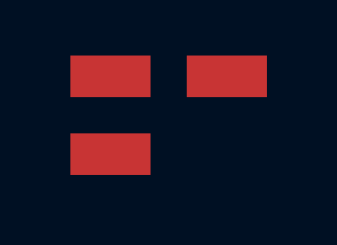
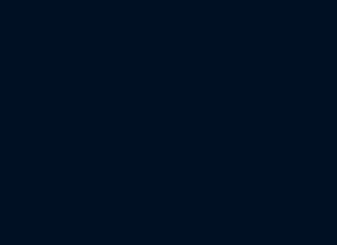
part: (110, 76) -> none
part: (226, 76) -> none
part: (110, 154) -> none

